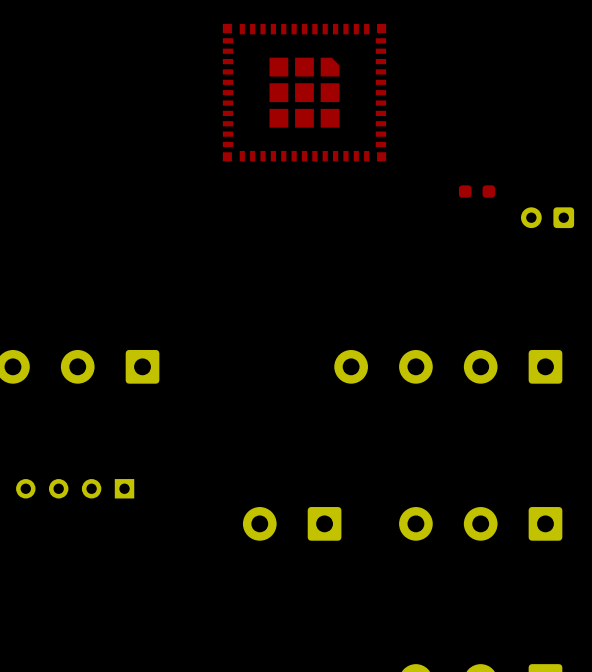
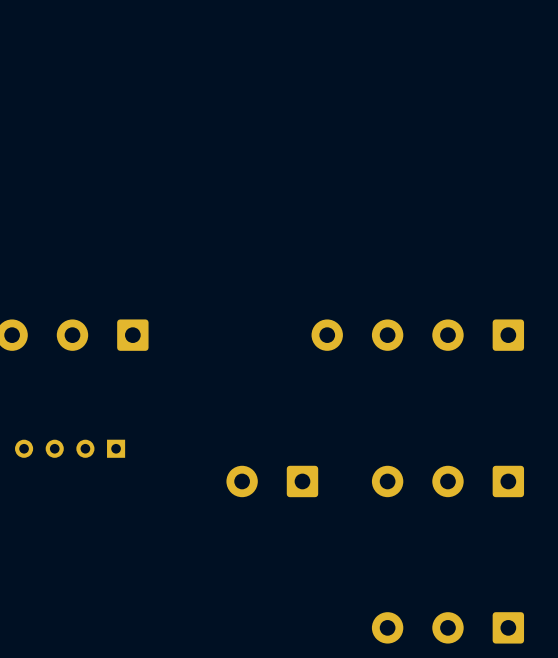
part: (304, 92) -> none
part: (477, 191) -> none
part: (547, 217) -> none

